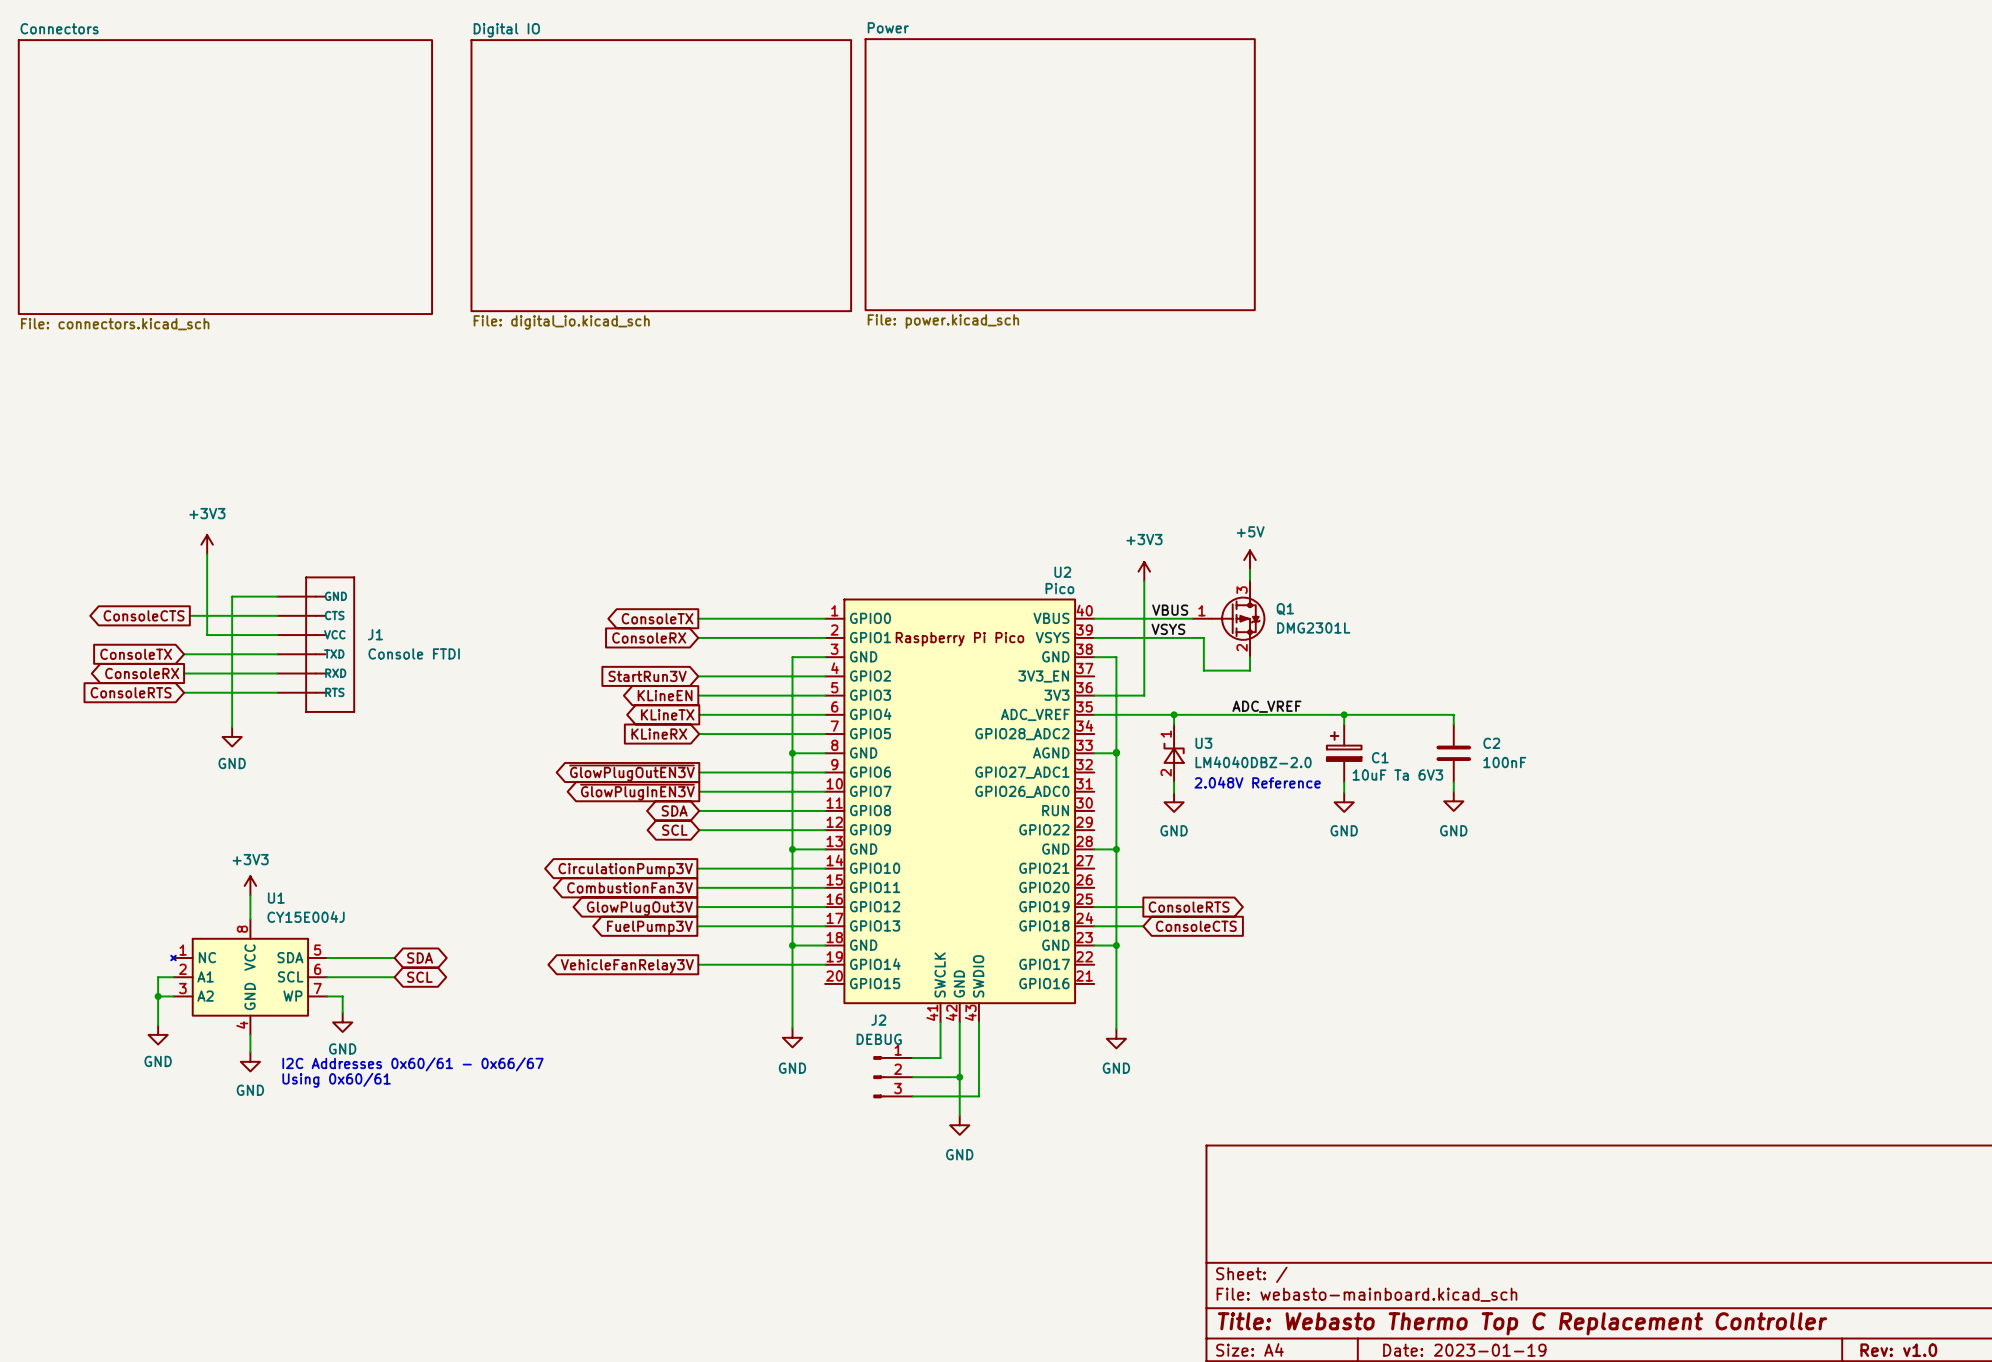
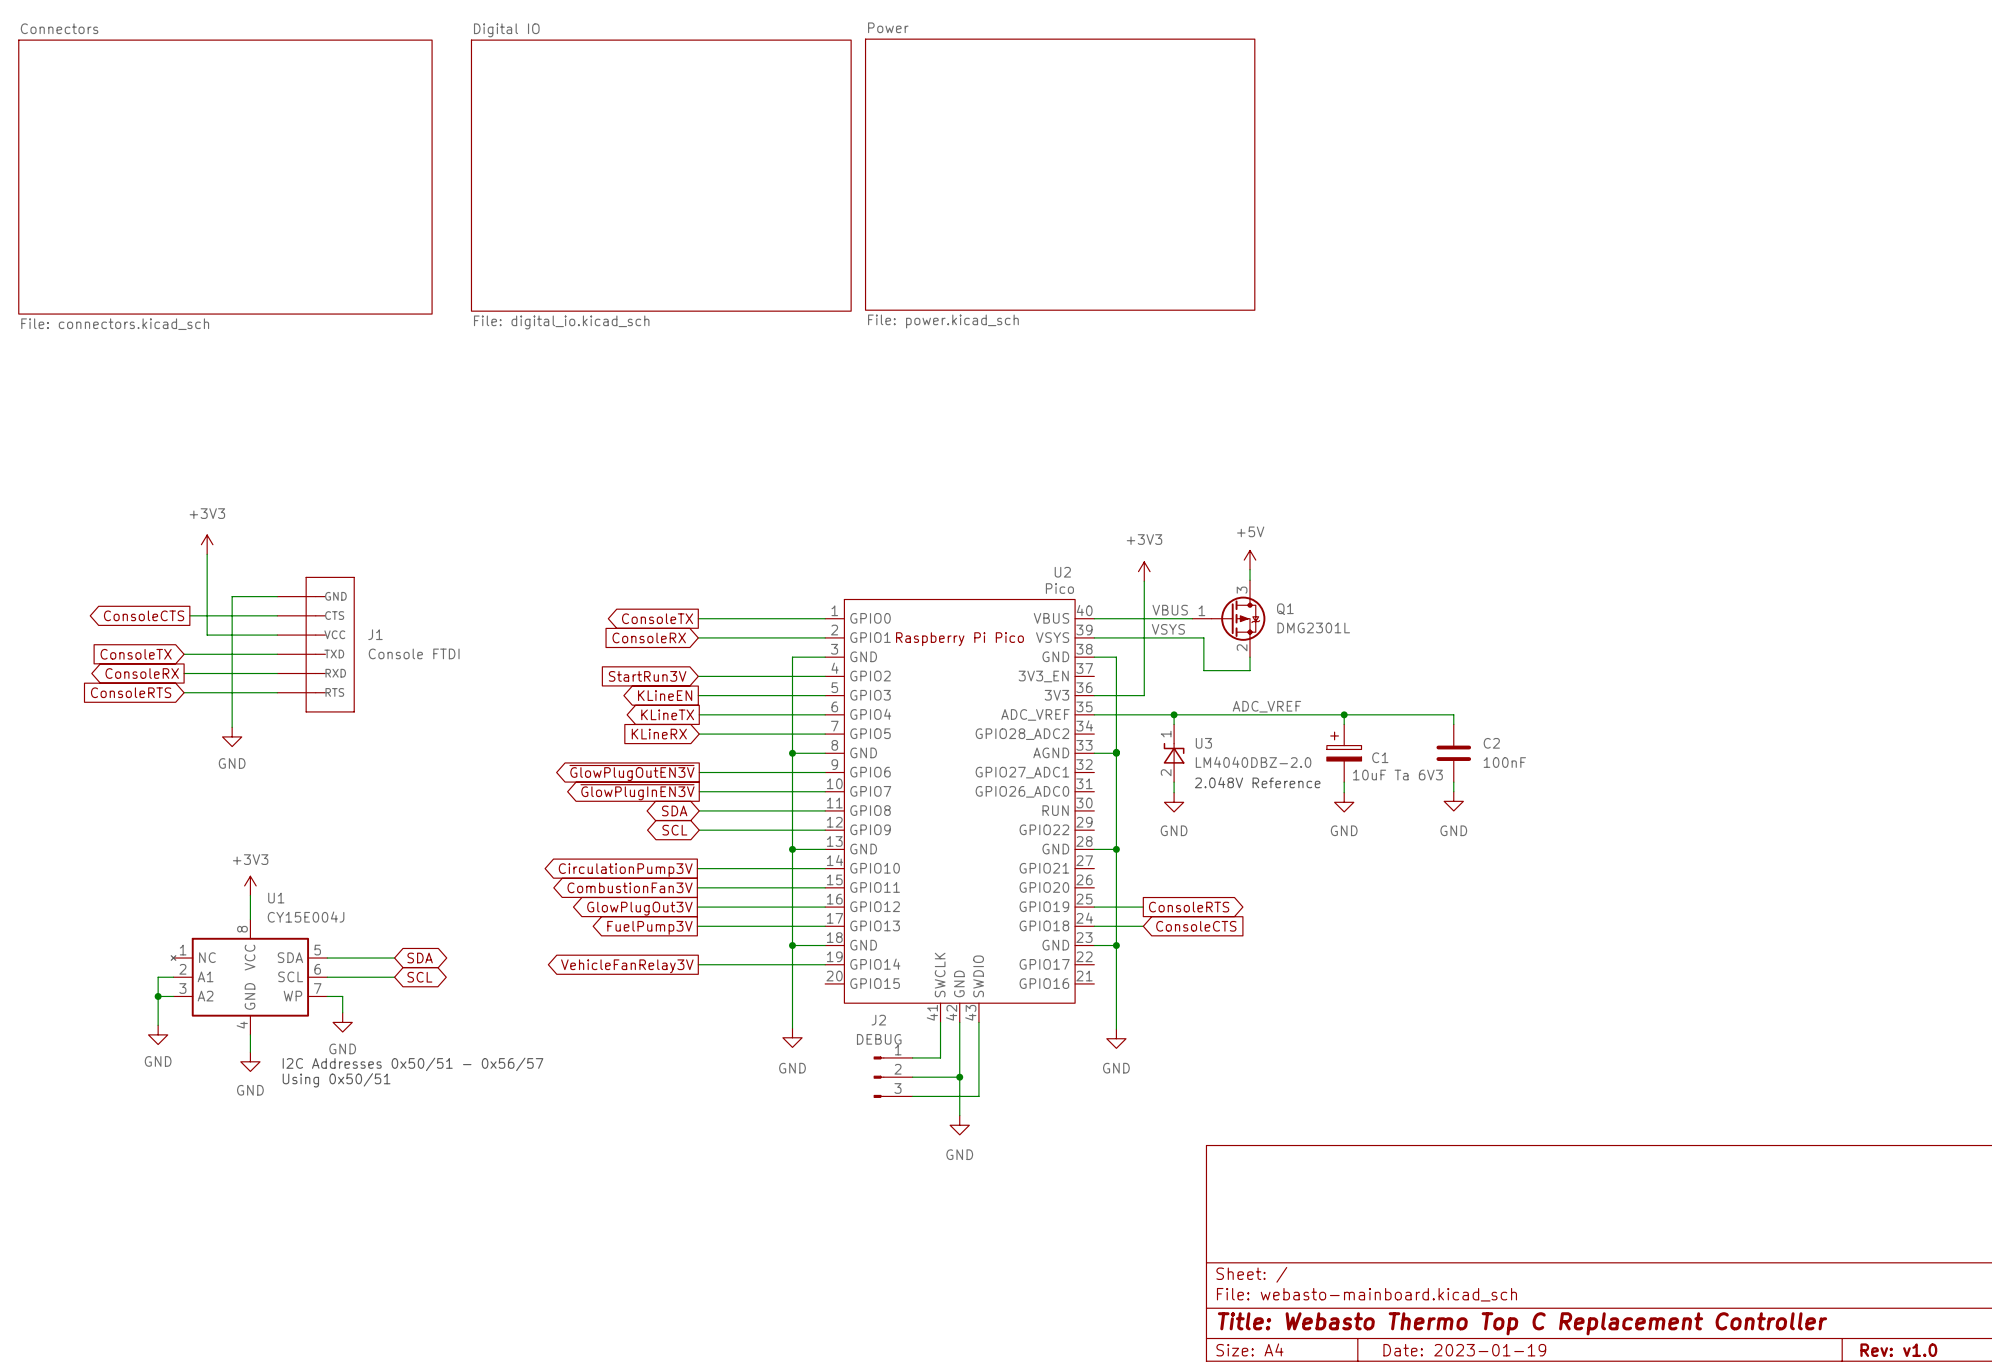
text: I2C Addresses 0x60/61 - 0x66/67 (413, 1064) -> I2C Addresses 0x50/51 - 0x56/57 (413, 1064)
text: Using 0x60/61 (336, 1080) -> Using 0x50/51 (336, 1080)

